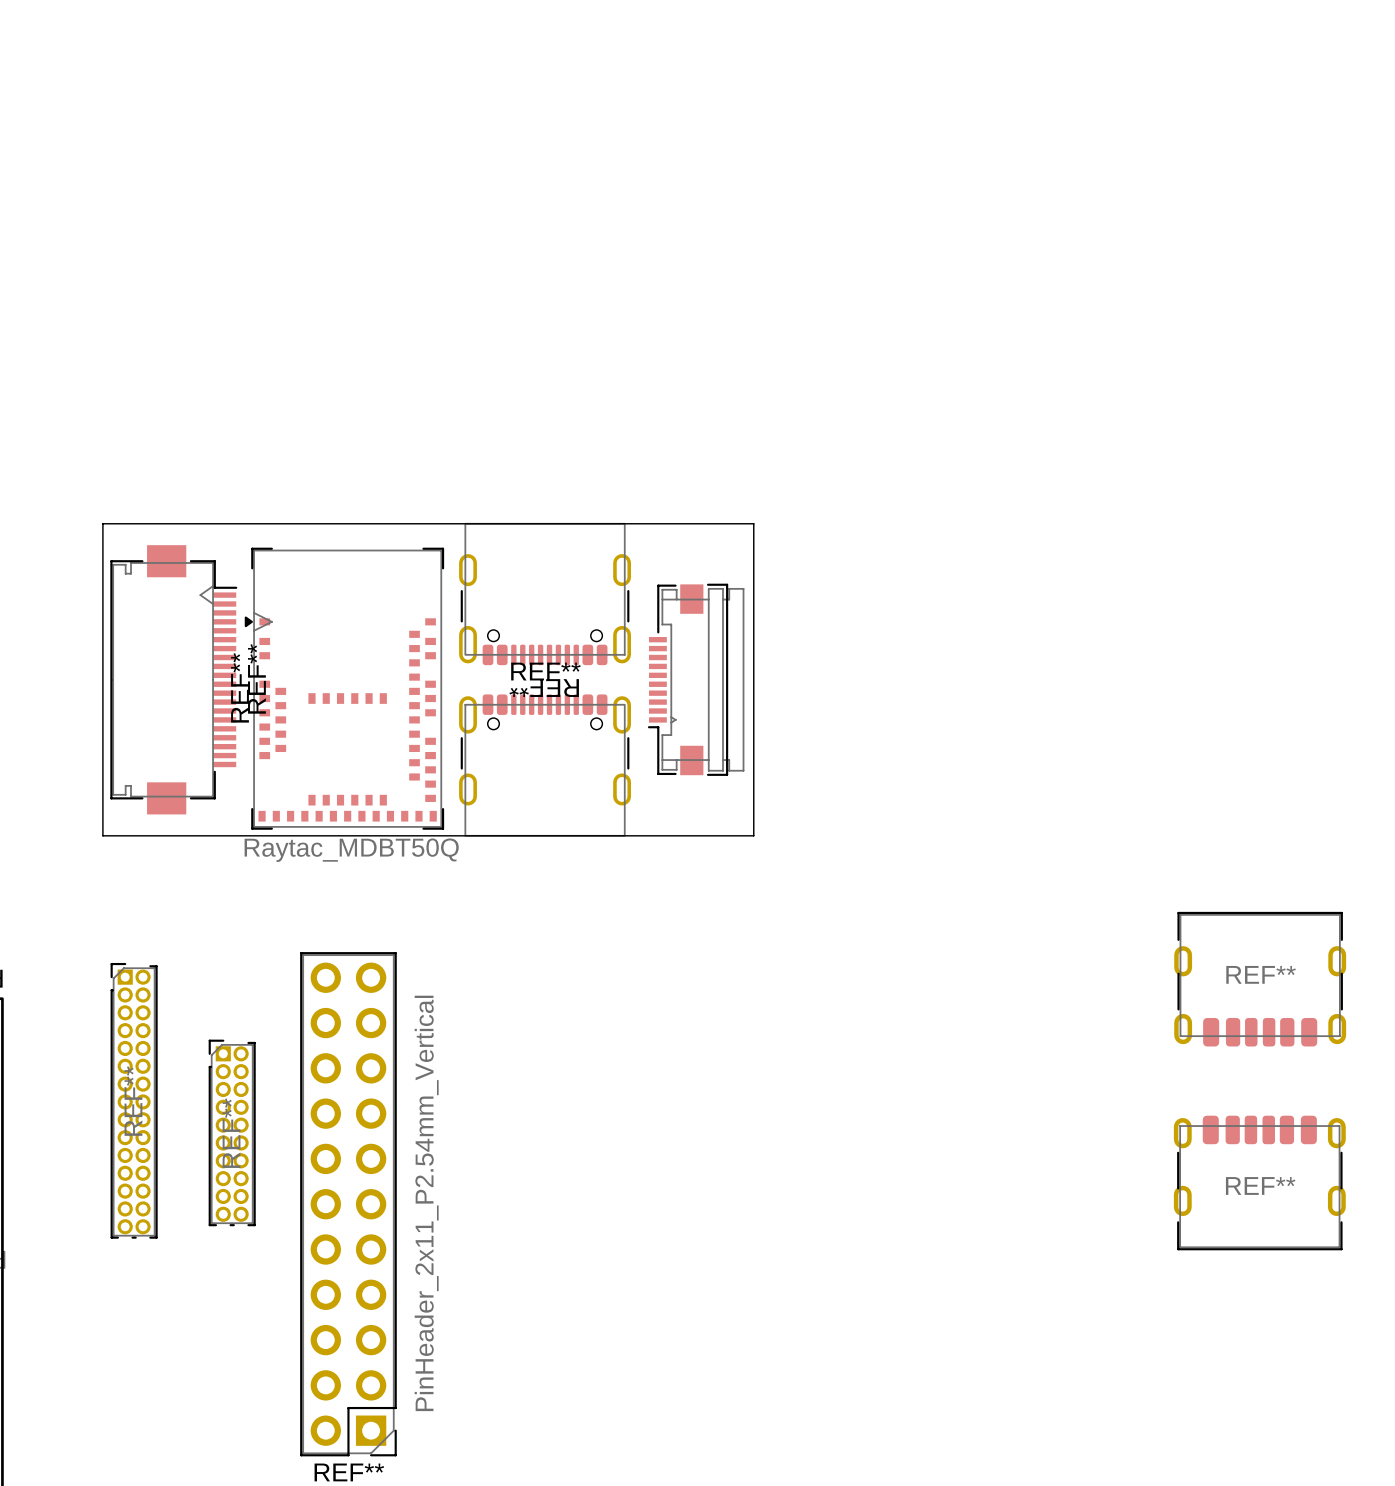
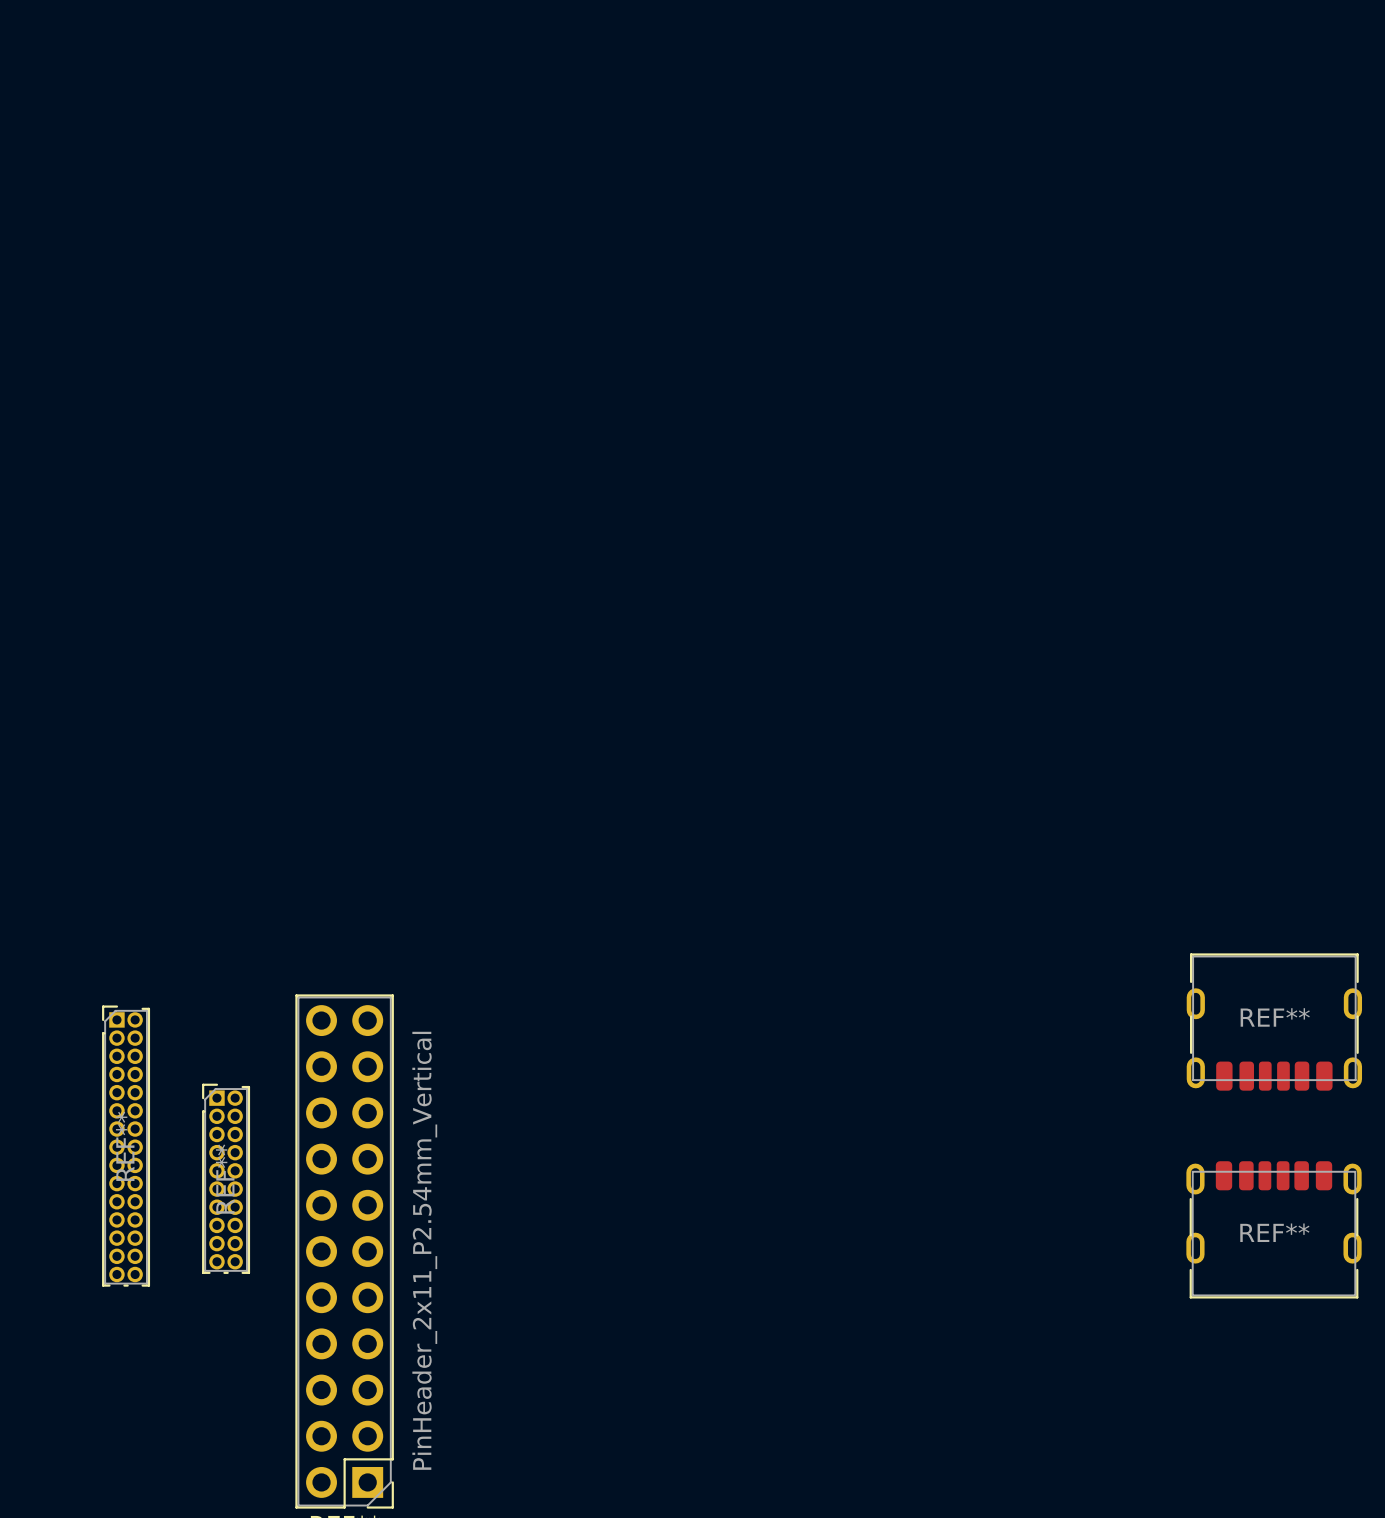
board edge: (102, 523) (753, 523) (753, 835) (102, 835) (102, 523) -> none
REF**: (545, 594) -> none
REF**: (173, 679) -> none
part: (696, 679) -> none
REF**: Raytac_MDBT50Q (344, 688) -> none
REF**: (545, 765) -> none

